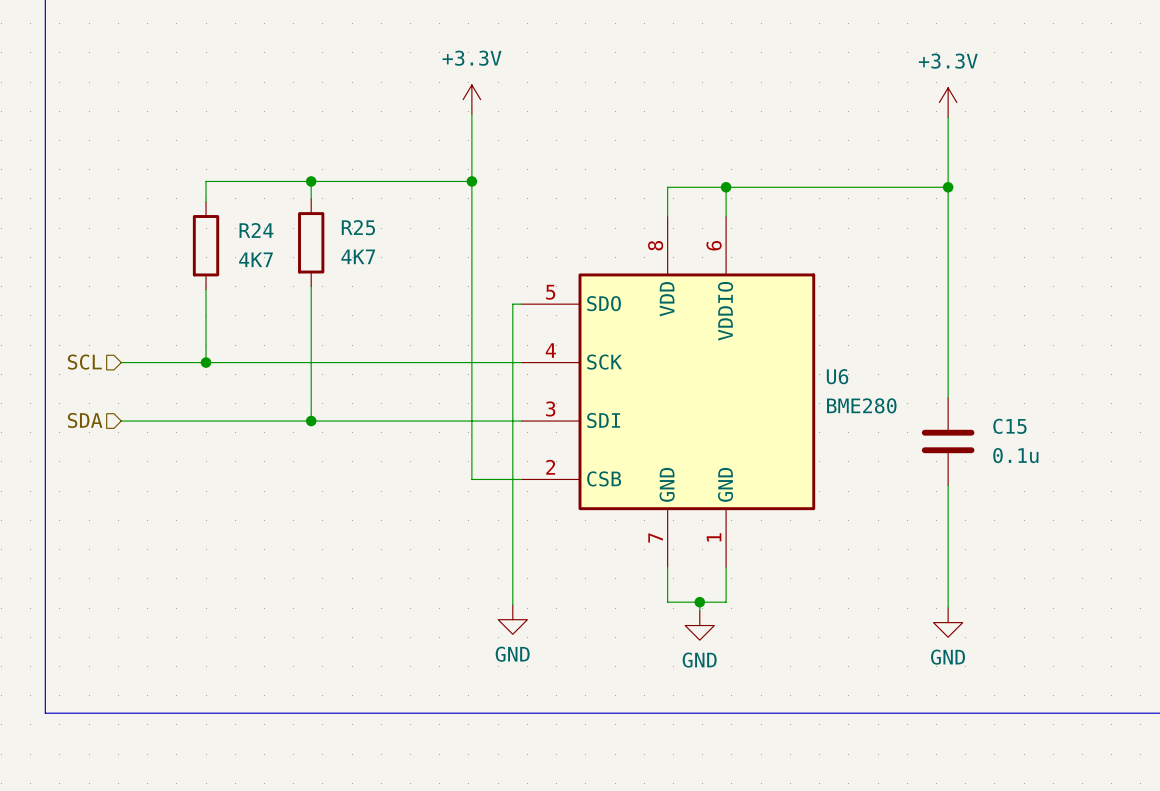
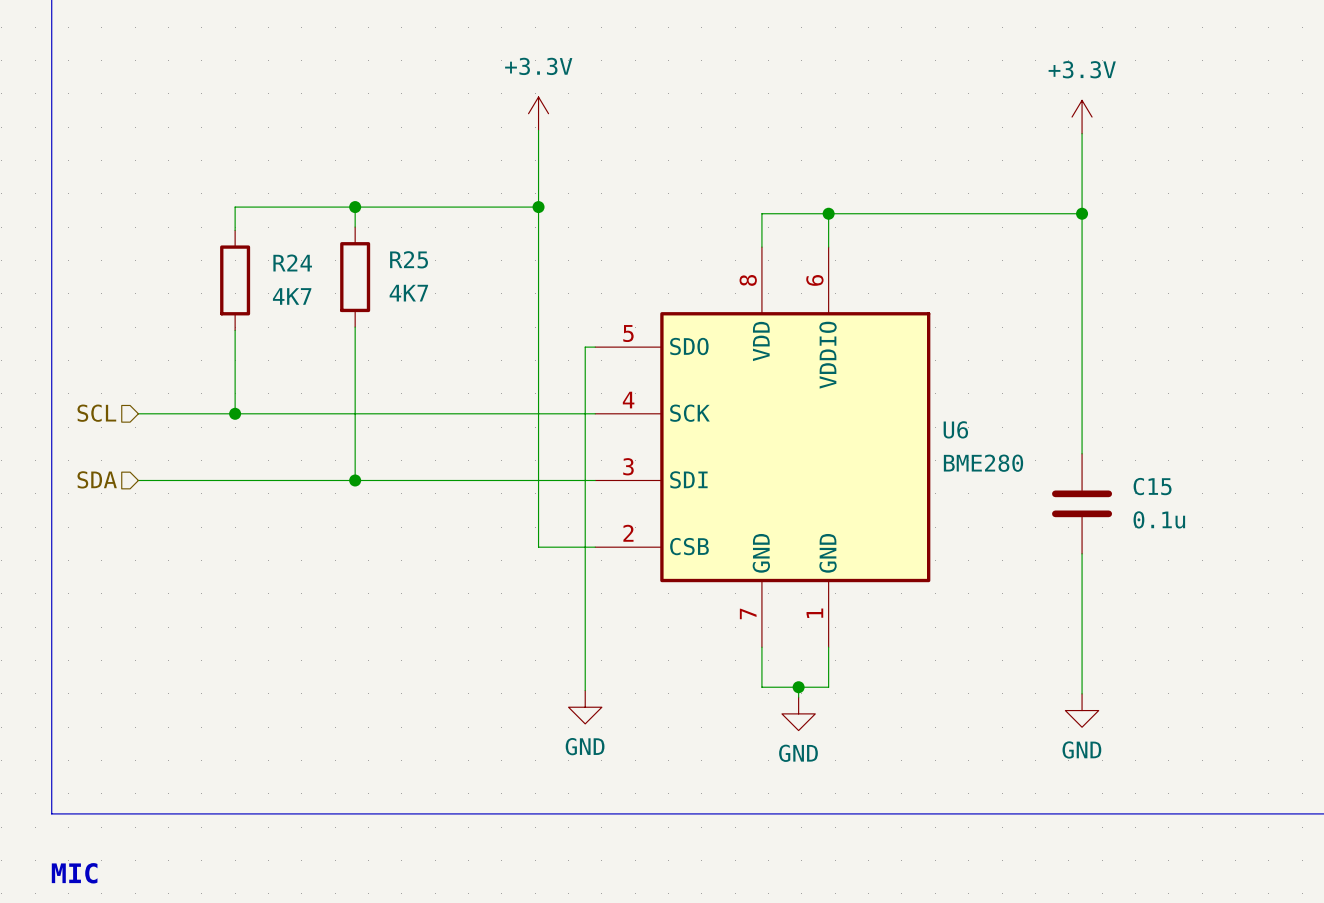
text: none -> MIC (74, 873)

